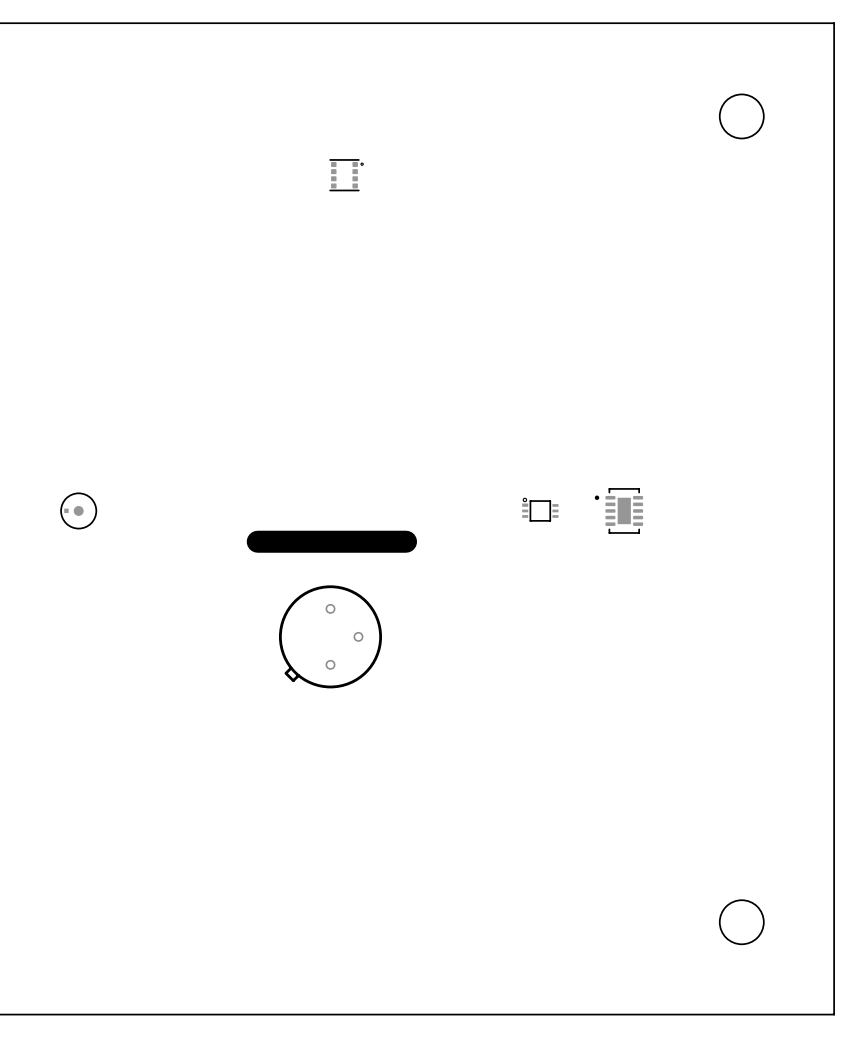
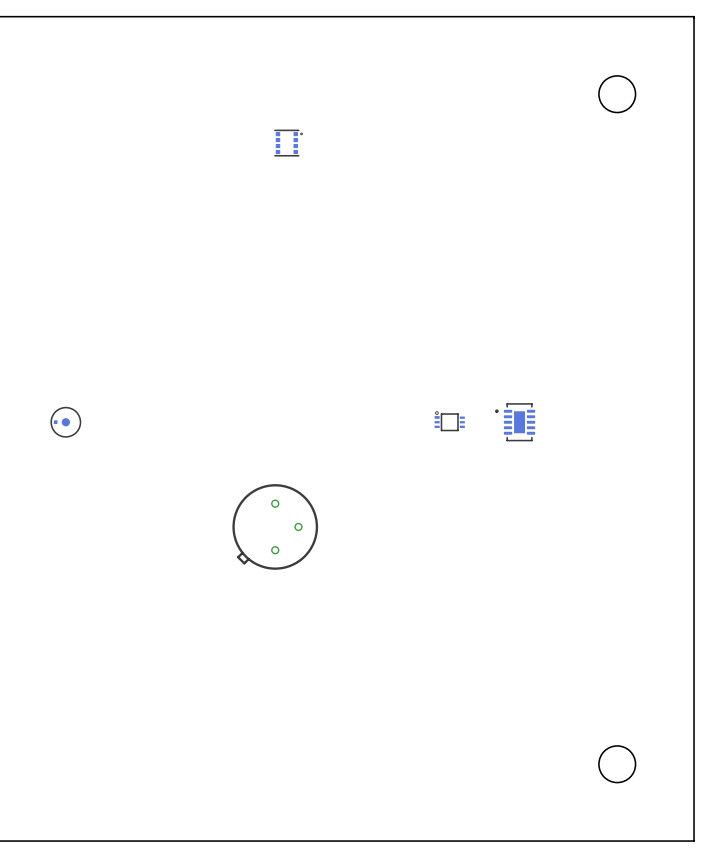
board edge: (406, 541) (254, 541) -> none

